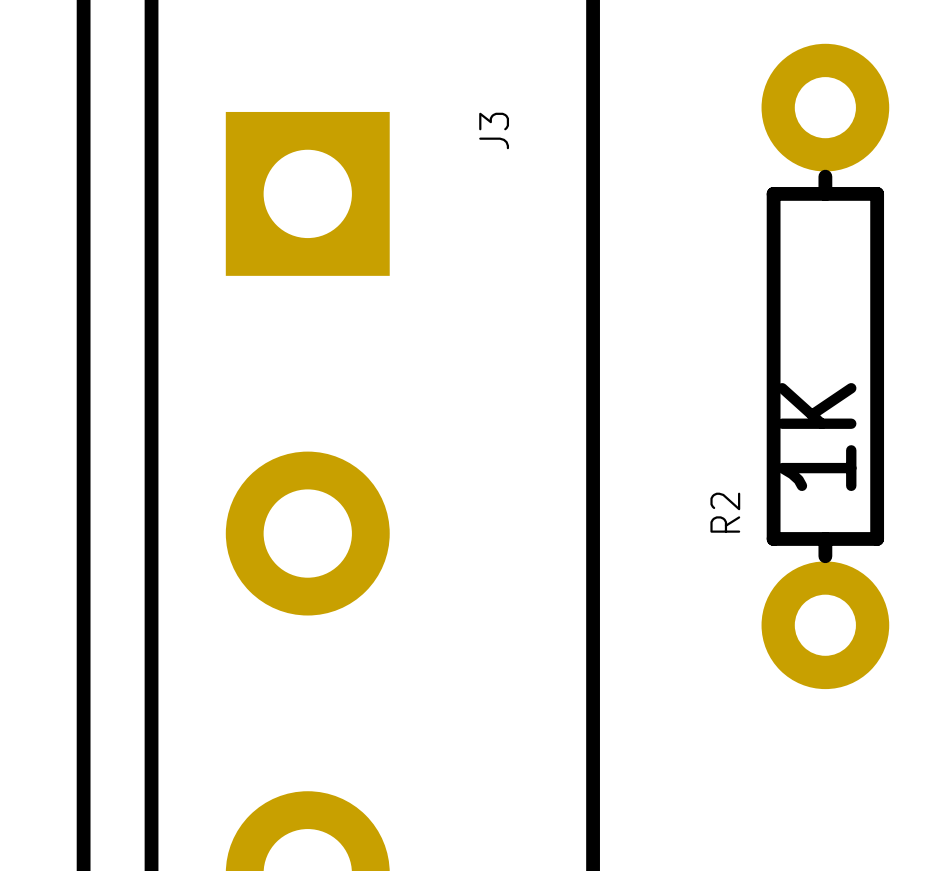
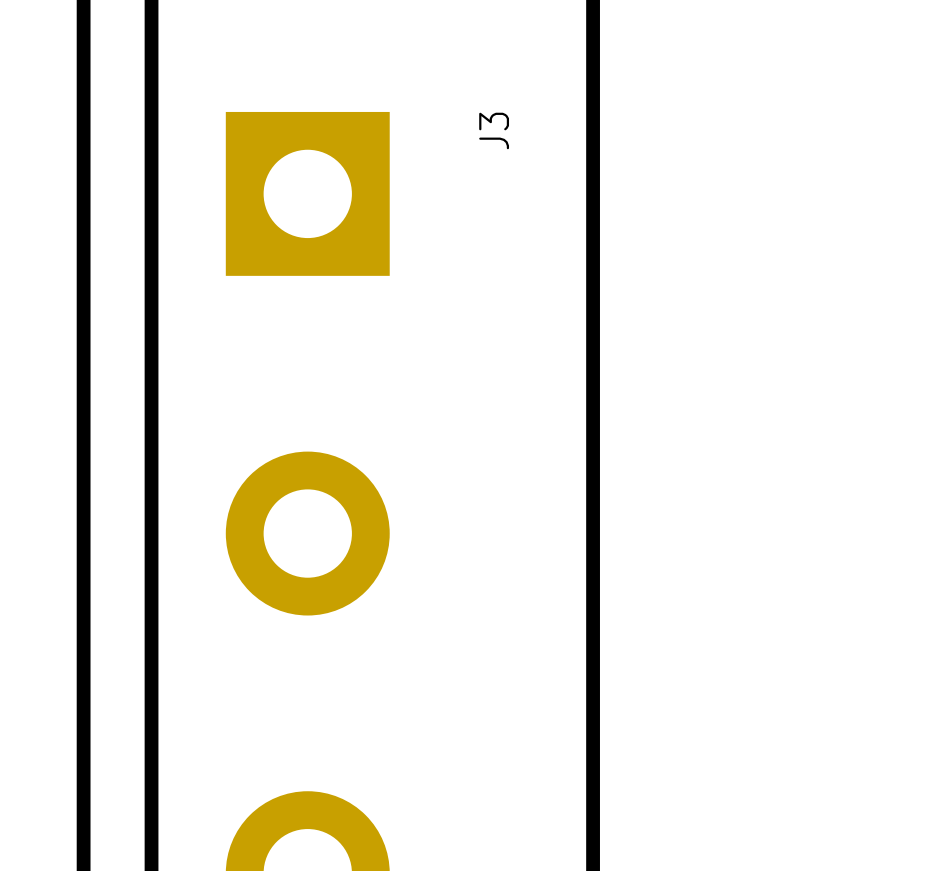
R2: 1K (825, 366) -> none

